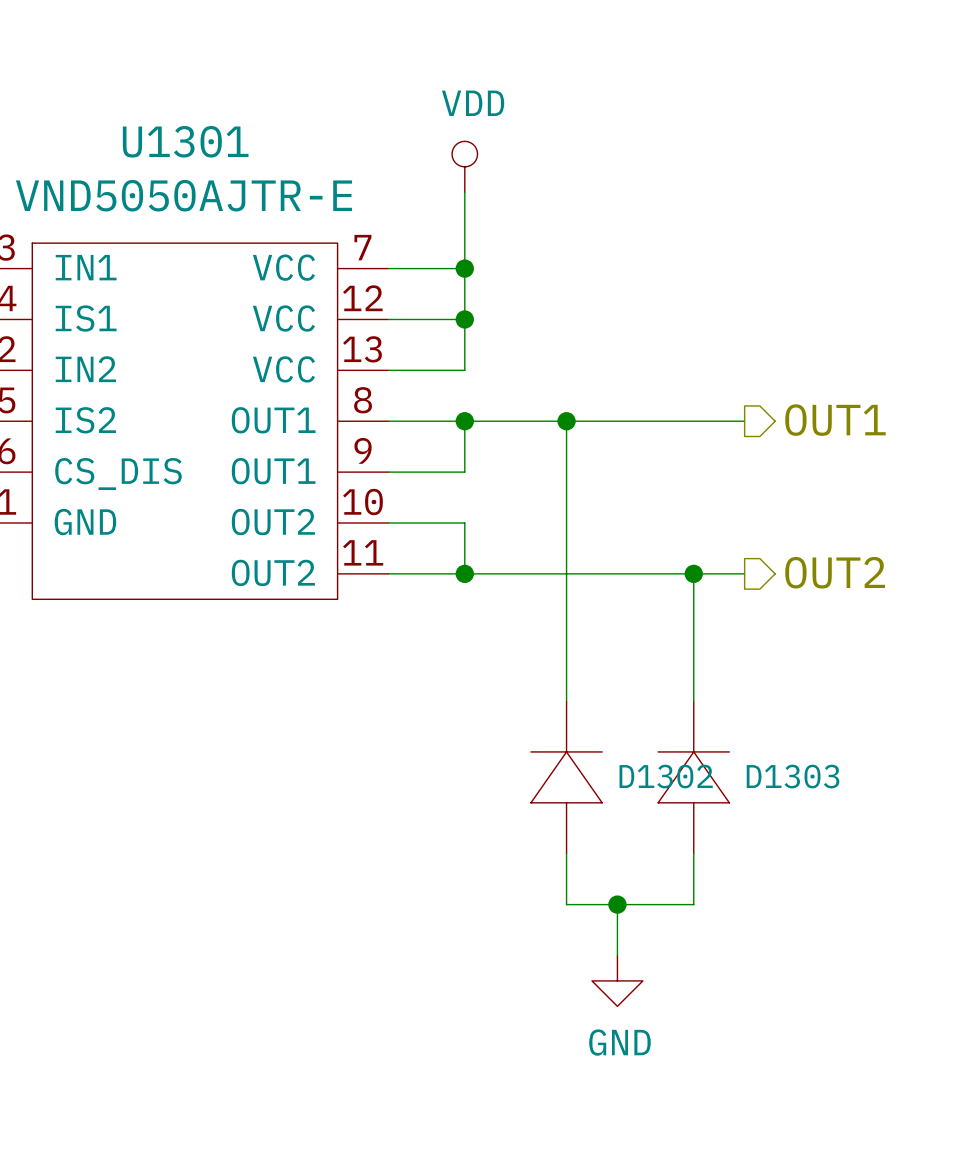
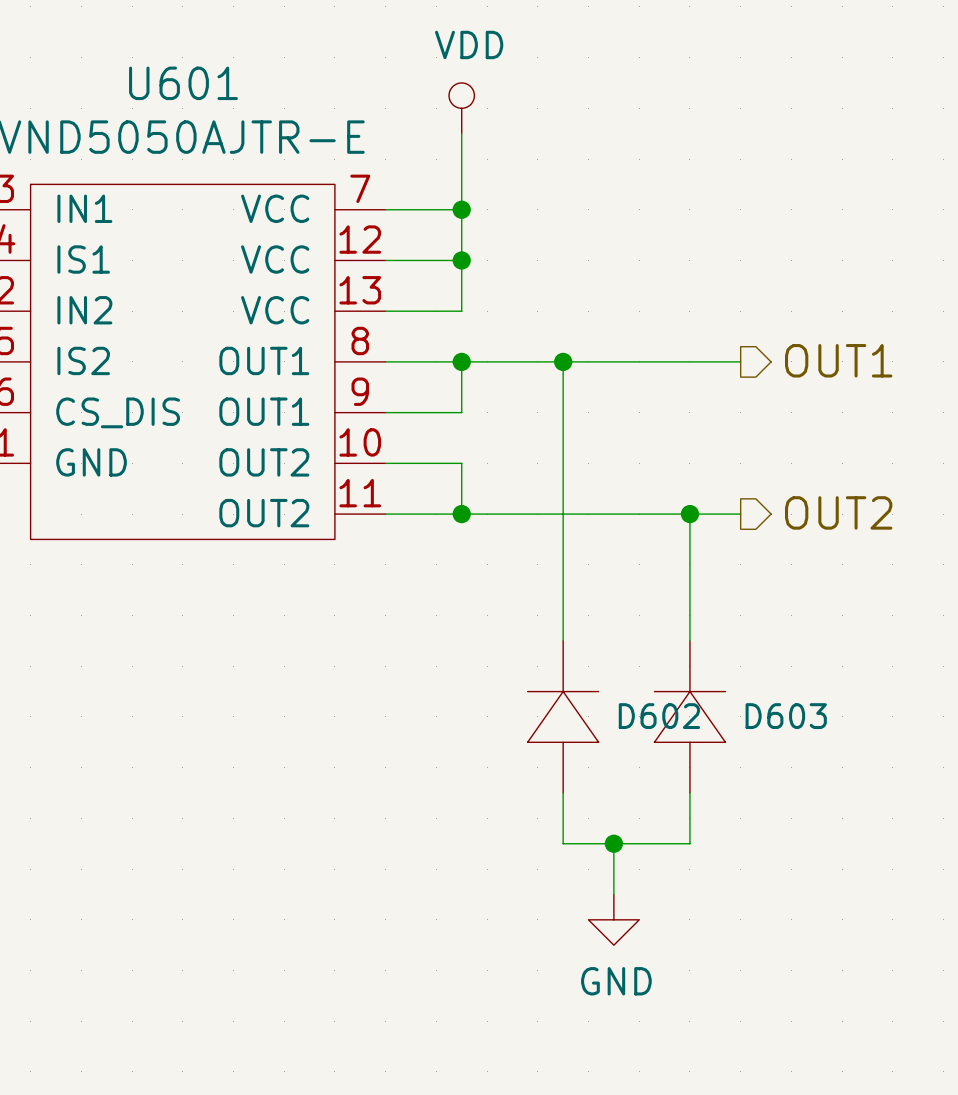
U1301 name: U1301 (185, 141) -> U601 (183, 83)
D1302 name: D1302 (666, 776) -> D602 (659, 716)
D1303 name: D1303 (793, 776) -> D603 (786, 716)

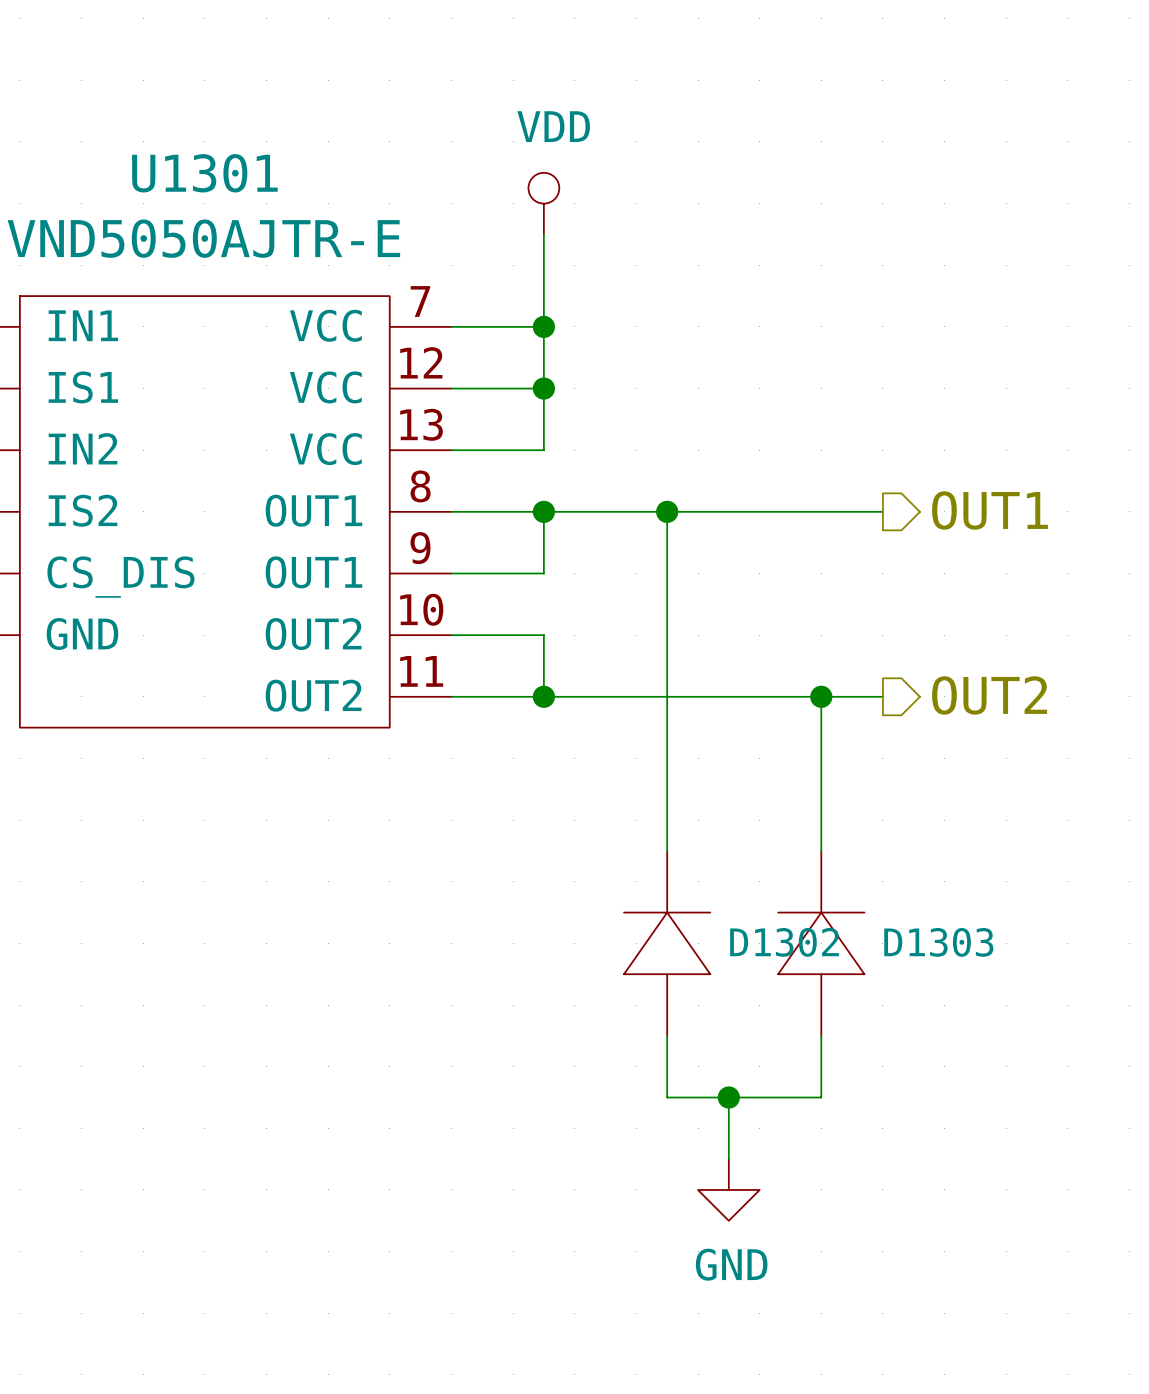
U601 name: U601 (183, 83) -> U1301 (204, 173)
D602 name: D602 (659, 716) -> D1302 (784, 942)
D603 name: D603 (786, 716) -> D1303 (938, 942)

